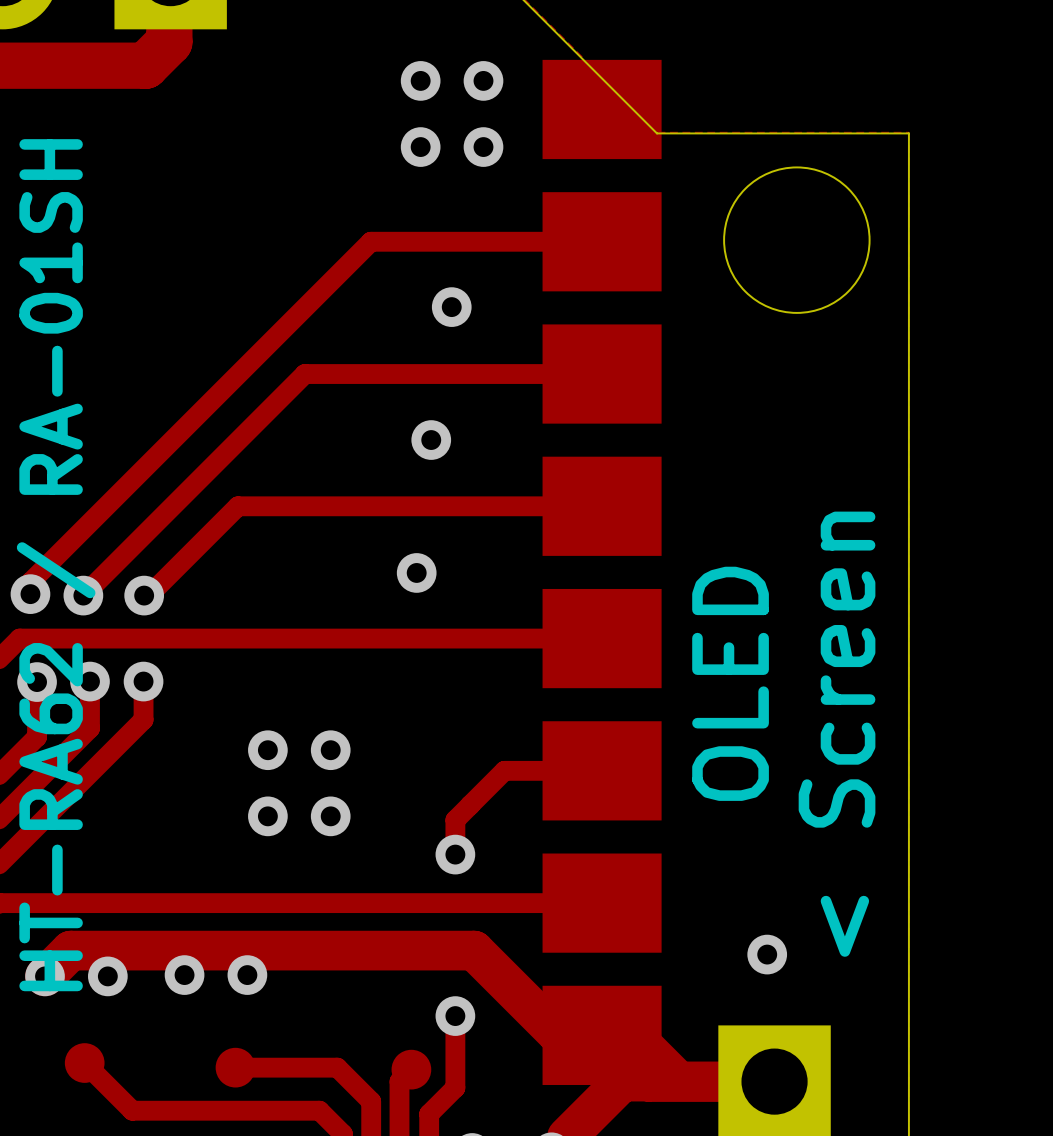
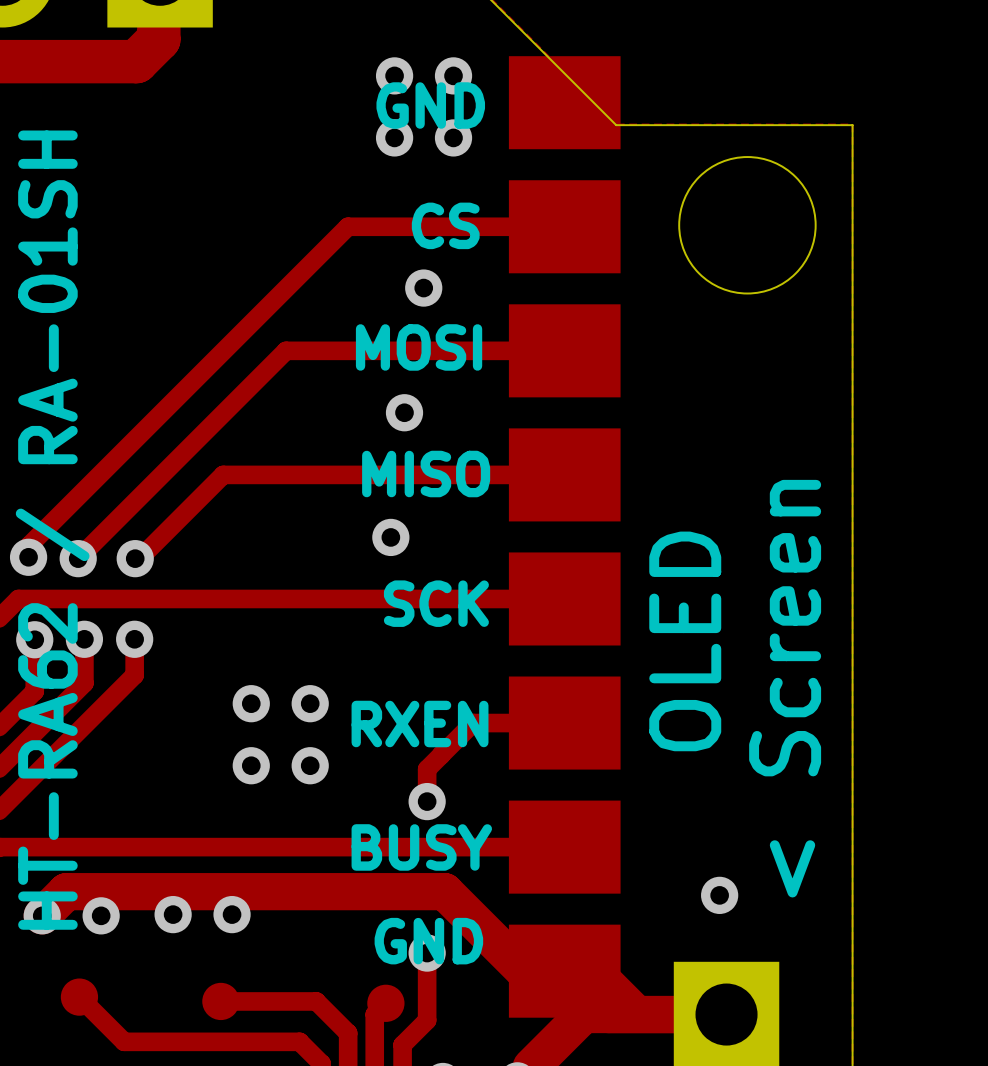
text: none -> GND (430, 105)
text: none -> CS (445, 225)
text: none -> MOSI (419, 347)
text: none -> MISO (426, 474)
text: none -> SCK (436, 603)
text: none -> RXEN (420, 724)
text: none -> BUSY (421, 847)
text: none -> GND (428, 941)

